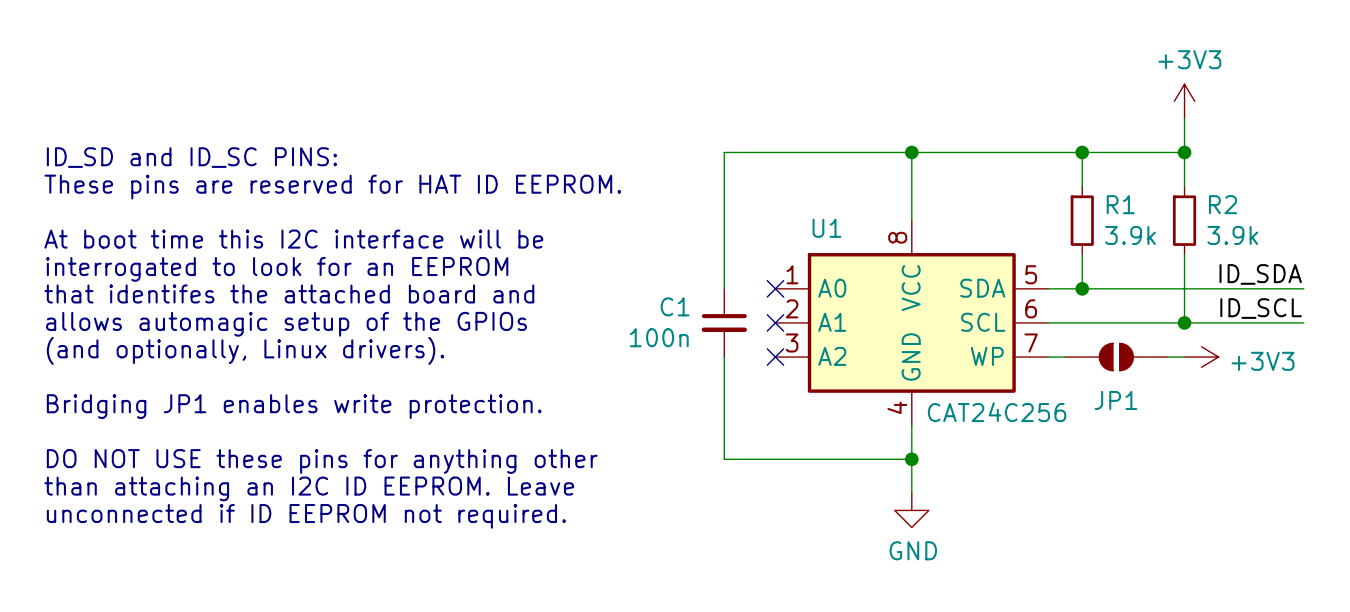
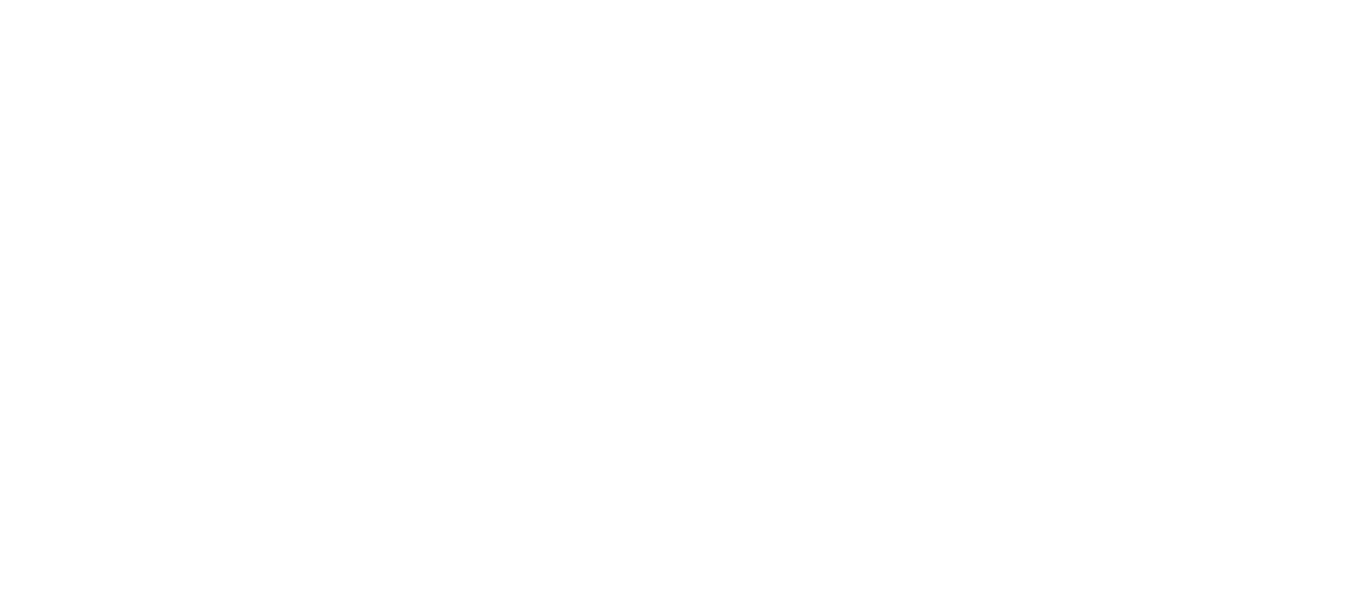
power symbol: +3V3 (1184, 101) -> none
wire: (1184, 118) (1184, 186) -> none
wire: (911, 152) (911, 220) -> none
junction: (911, 152) -> none
wire: (1082, 152) (1082, 186) -> none
junction: (1082, 152) -> none
wire: (1184, 152) (724, 152) (724, 288) -> none
junction: (1184, 152) -> none
text: ID_SD and ID_SC PINS: (191, 157) -> none
text: These pins are reserved for HAT ID EEPROM. (332, 187) -> none
R1: 3.9k (1082, 220) -> none
R2: 3.9k (1184, 220) -> none
text: At boot time this I2C interface will be (293, 239) -> none
wire: (1082, 254) (1082, 288) -> none
wire: (1184, 254) (1184, 322) -> none
text: interrogated to look for an EEPROM (277, 269) -> none
label: ID_SDA (1260, 274) -> none
no-connect mark: (775, 288) -> none
wire: (1048, 288) (1303, 288) -> none
junction: (1082, 288) -> none
text: that identifes the attached board and (289, 293) -> none
label: ID_SCL (1261, 308) -> none
C1: 100n (724, 322) -> none
no-connect mark: (775, 322) -> none
U1: CAT24C256 (911, 322) -> none
wire: (1048, 322) (1303, 322) -> none
junction: (1184, 322) -> none
text: allows automagic setup of the GPIOs (286, 324) -> none
text: (and optionally, Linux drivers). (245, 350) -> none
wire: (724, 357) (724, 459) (911, 459) -> none
no-connect mark: (775, 357) -> none
wire: (1048, 357) (1065, 357) -> none
JP1: (1116, 357) -> none
wire: (1167, 357) (1184, 357) -> none
power symbol: +3V3 (1201, 357) -> none
text: Bridging JP1 enables write protection. (294, 406) -> none
wire: (911, 425) (911, 493) -> none
junction: (911, 459) -> none
text: DO NOT USE these pins for anything other (322, 461) -> none
text: than attaching an I2C ID EEPROM. Leave (309, 488) -> none
power symbol: GND (911, 510) -> none
text: unconnected if ID EEPROM not required. (306, 516) -> none

